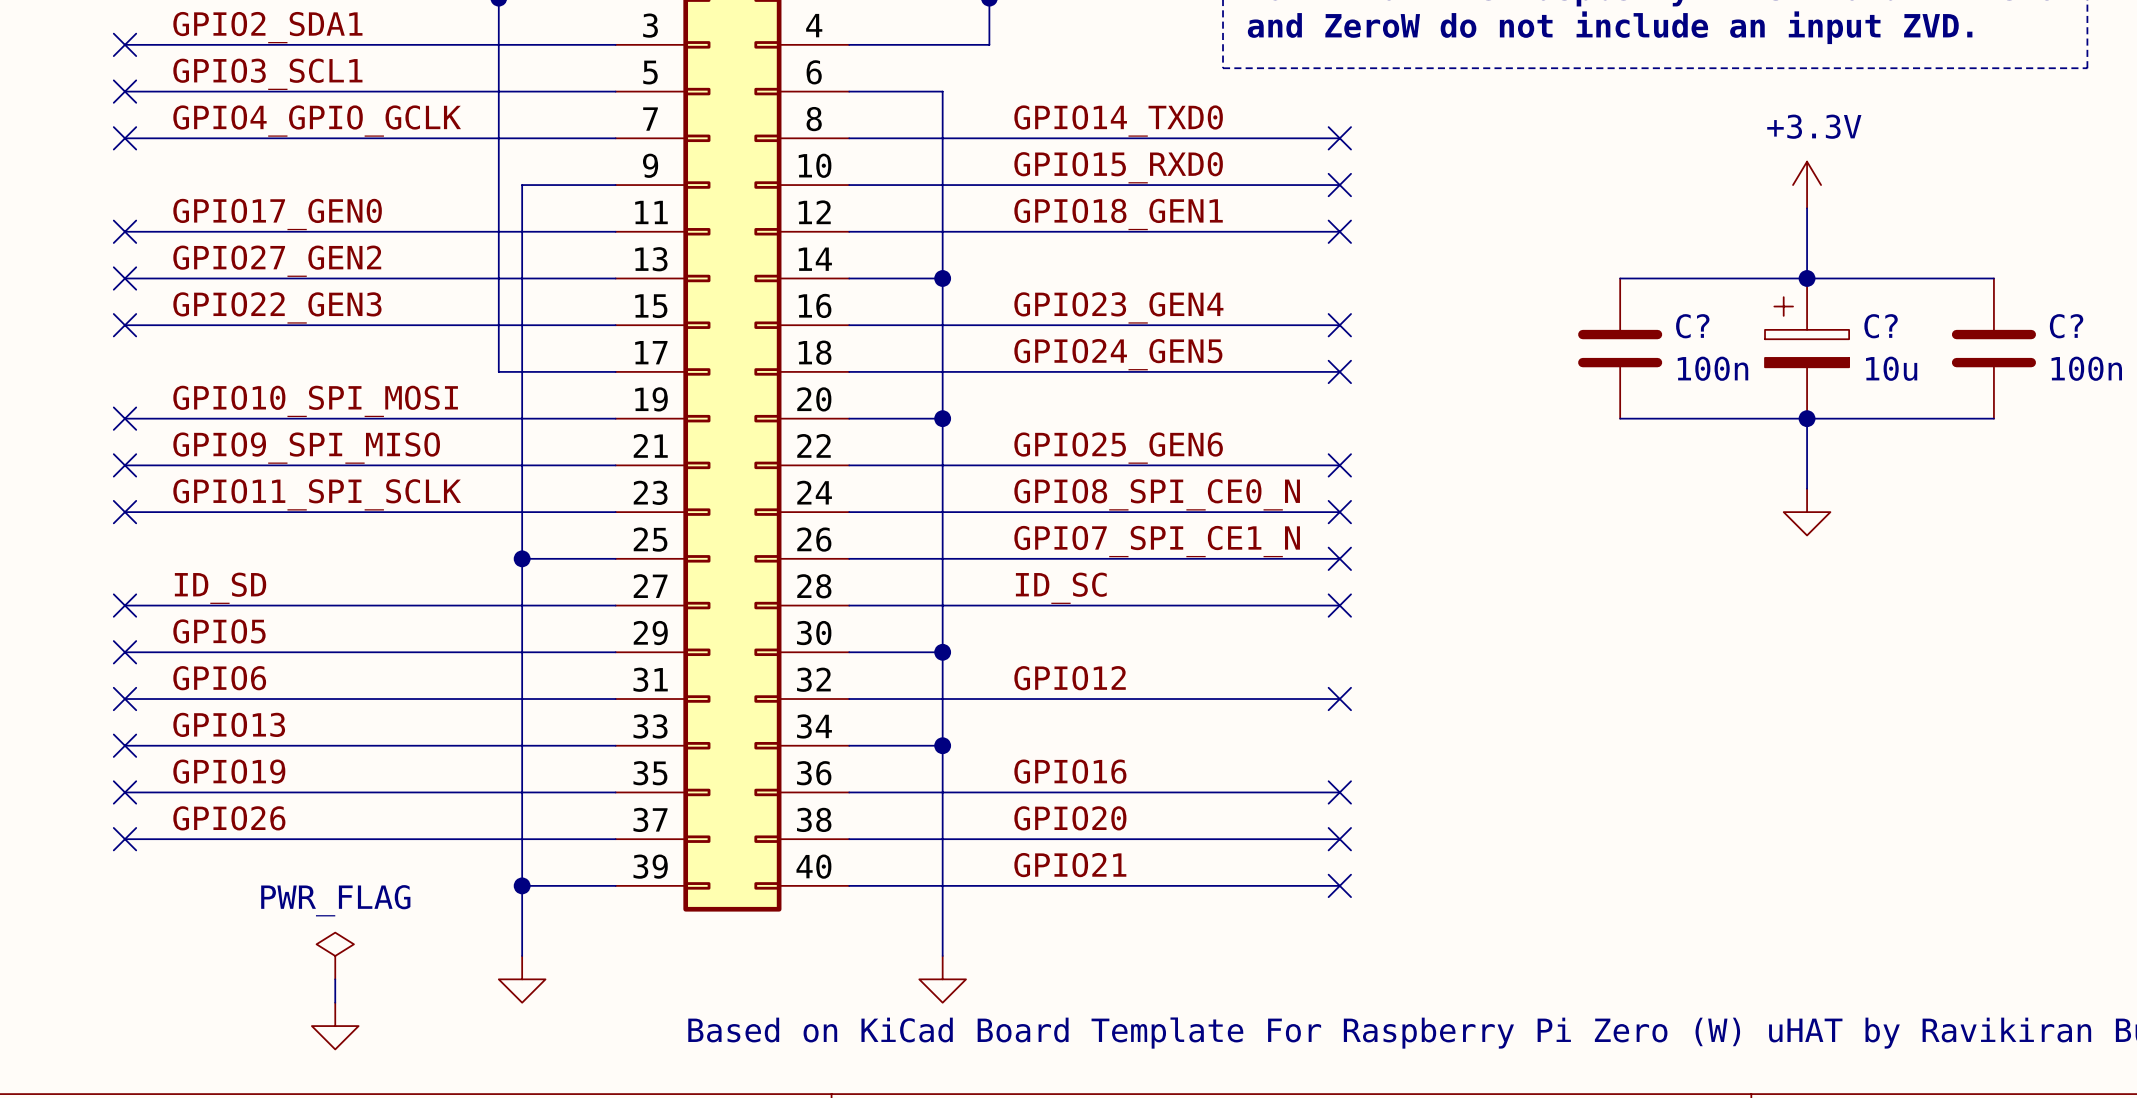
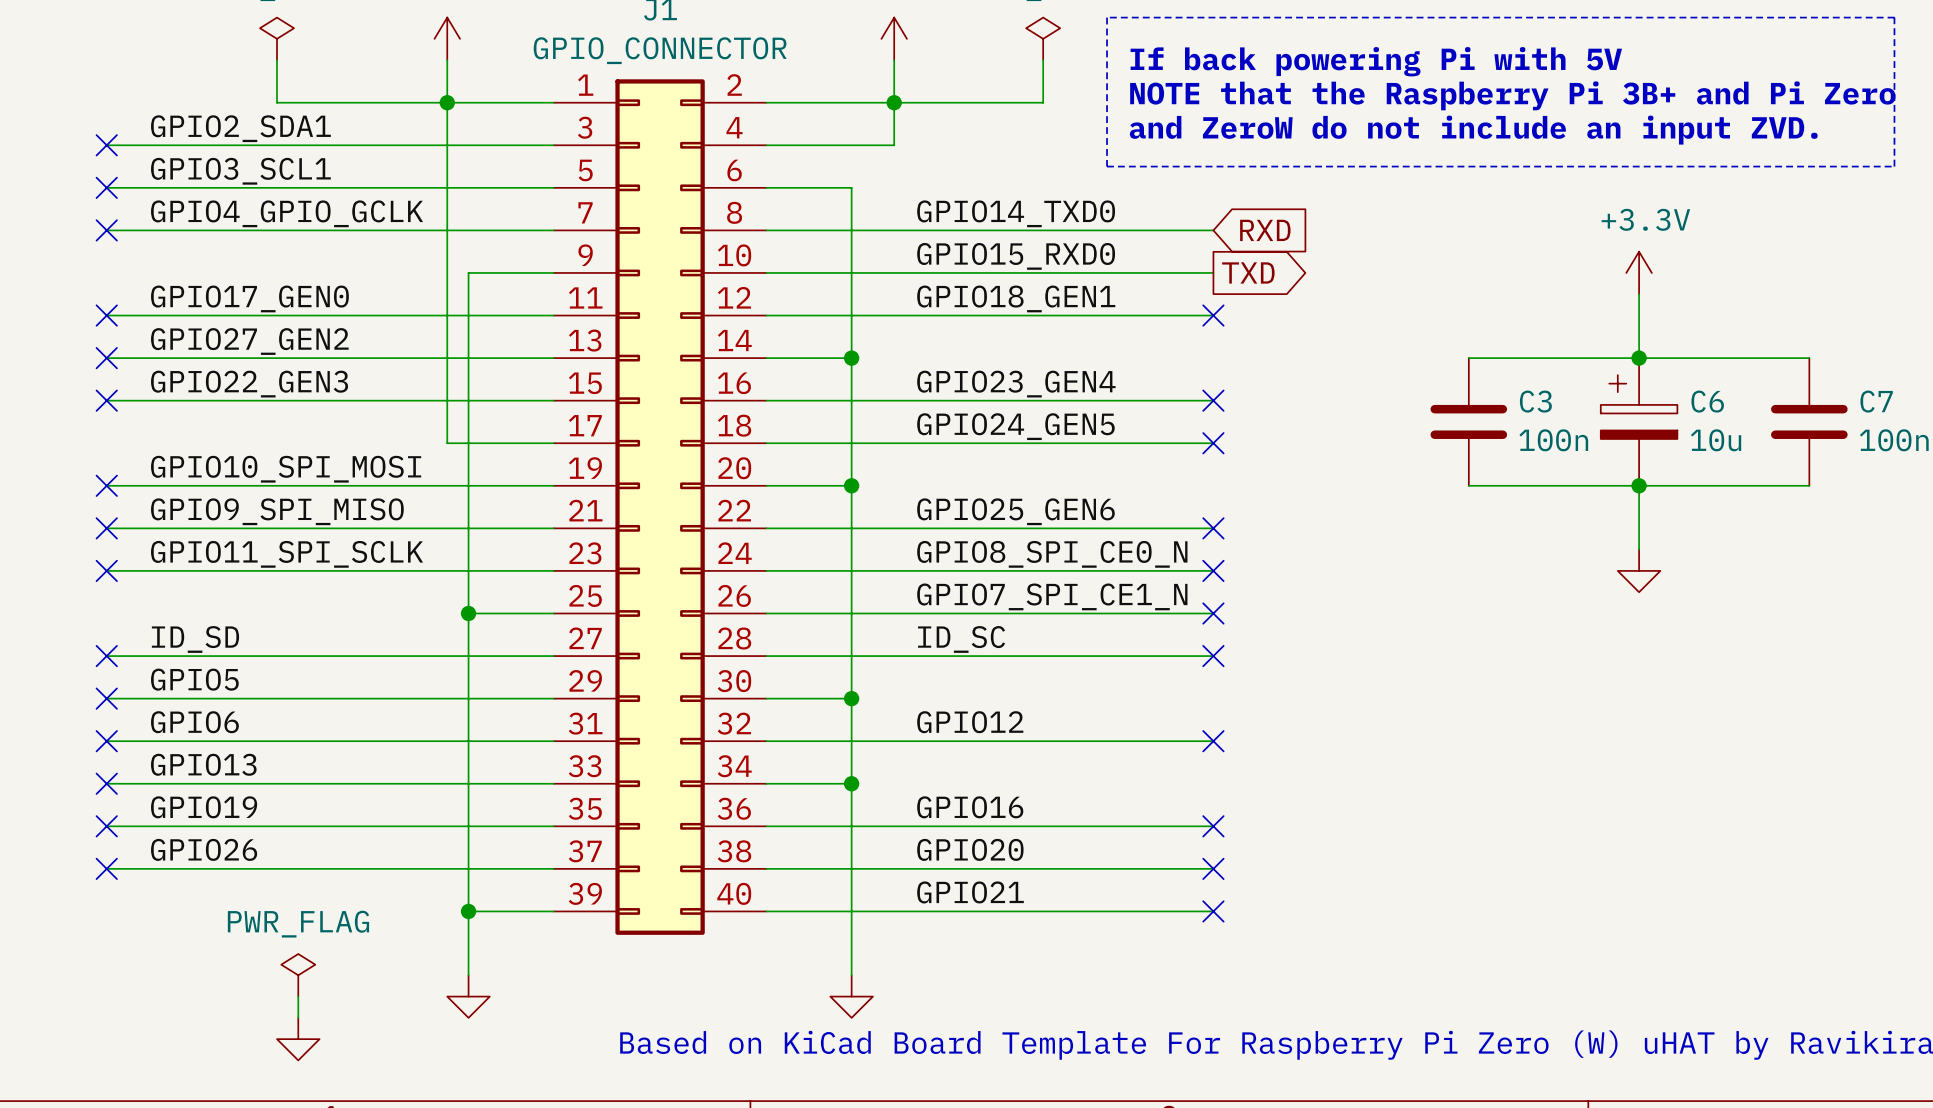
no-connect mark: (1339, 138) -> none
global label: none -> RXD (1265, 230)
no-connect mark: (1339, 185) -> none
global label: none -> TXD (1248, 272)
C? name: C? (1692, 326) -> C3 (1535, 401)
C? name: C? (1881, 326) -> C6 (1707, 401)
C? name: C? (2066, 326) -> C7 (1876, 401)

